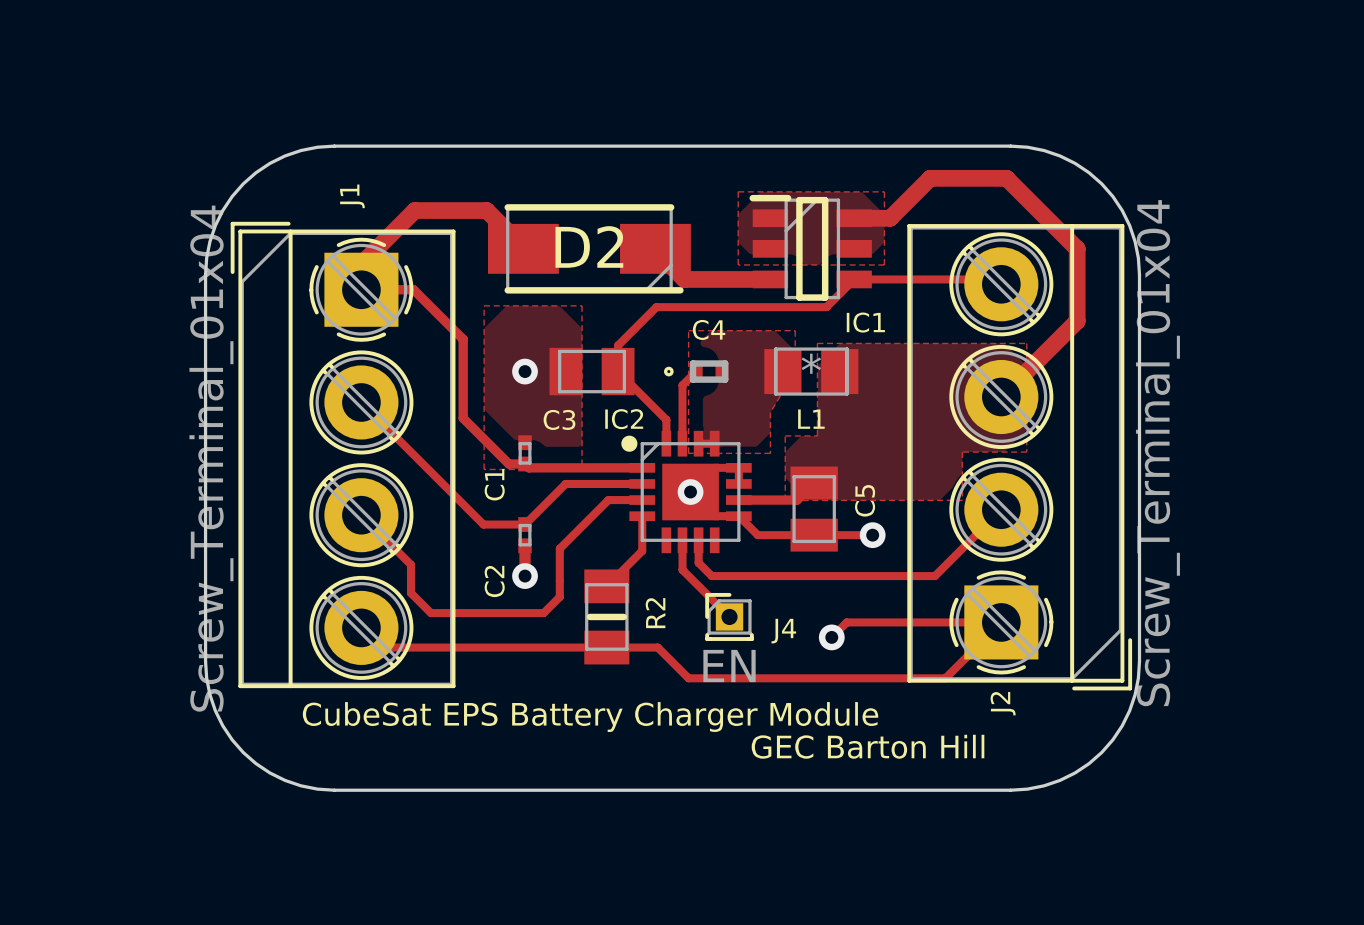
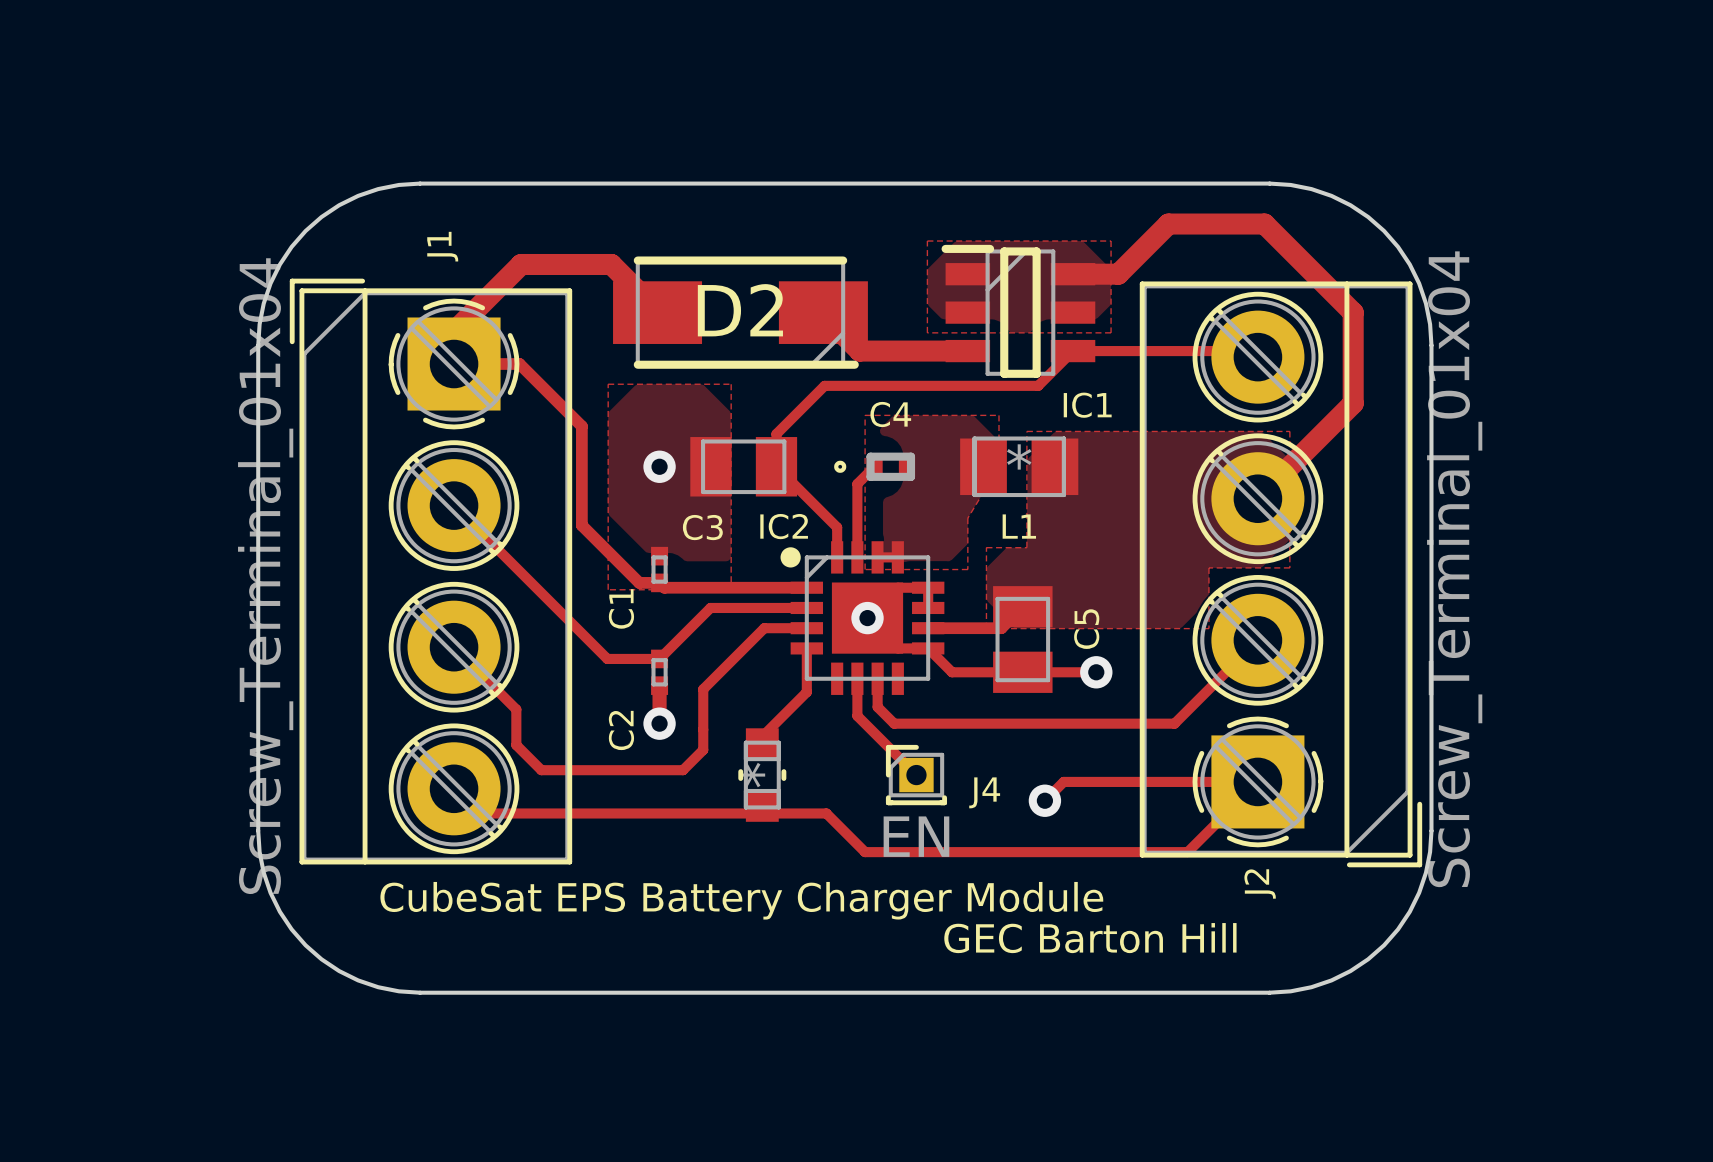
R2: (606, 616) -> none
part: none -> (762, 775)

